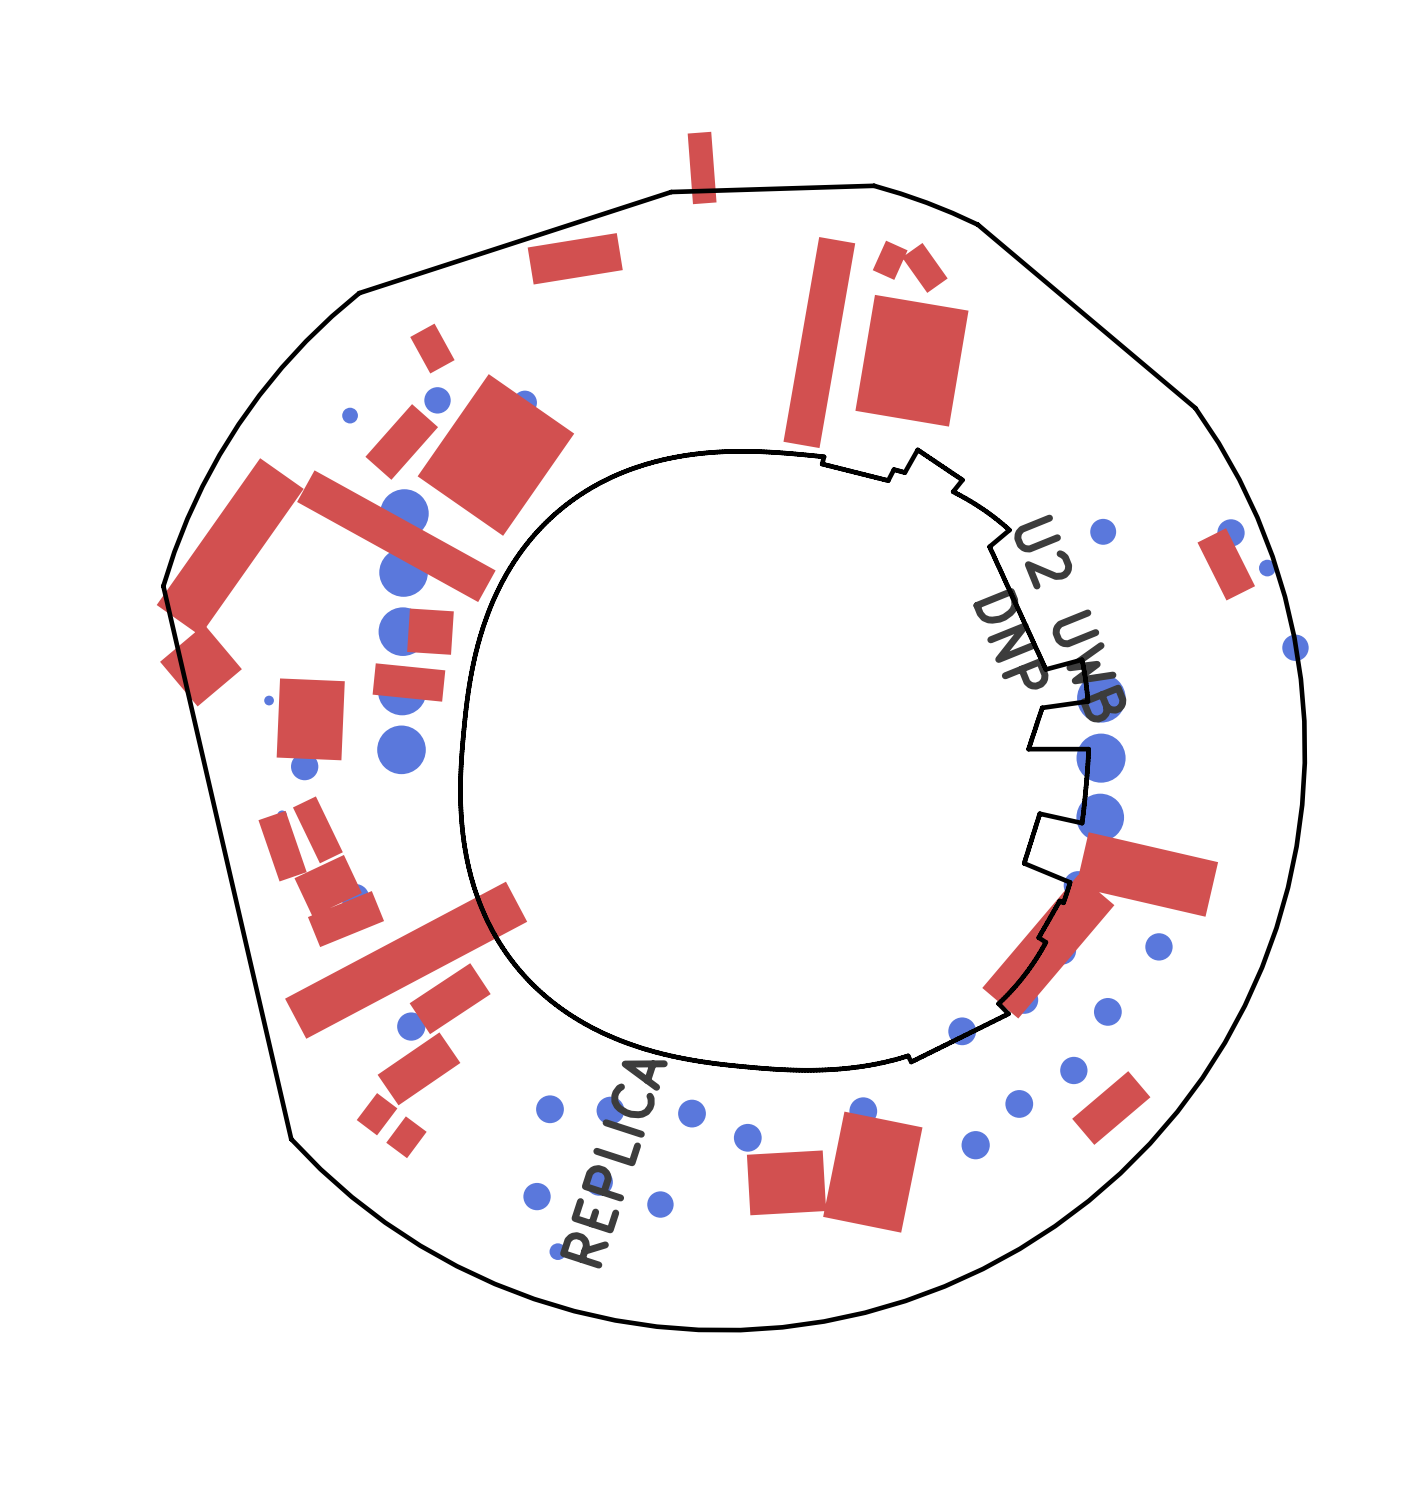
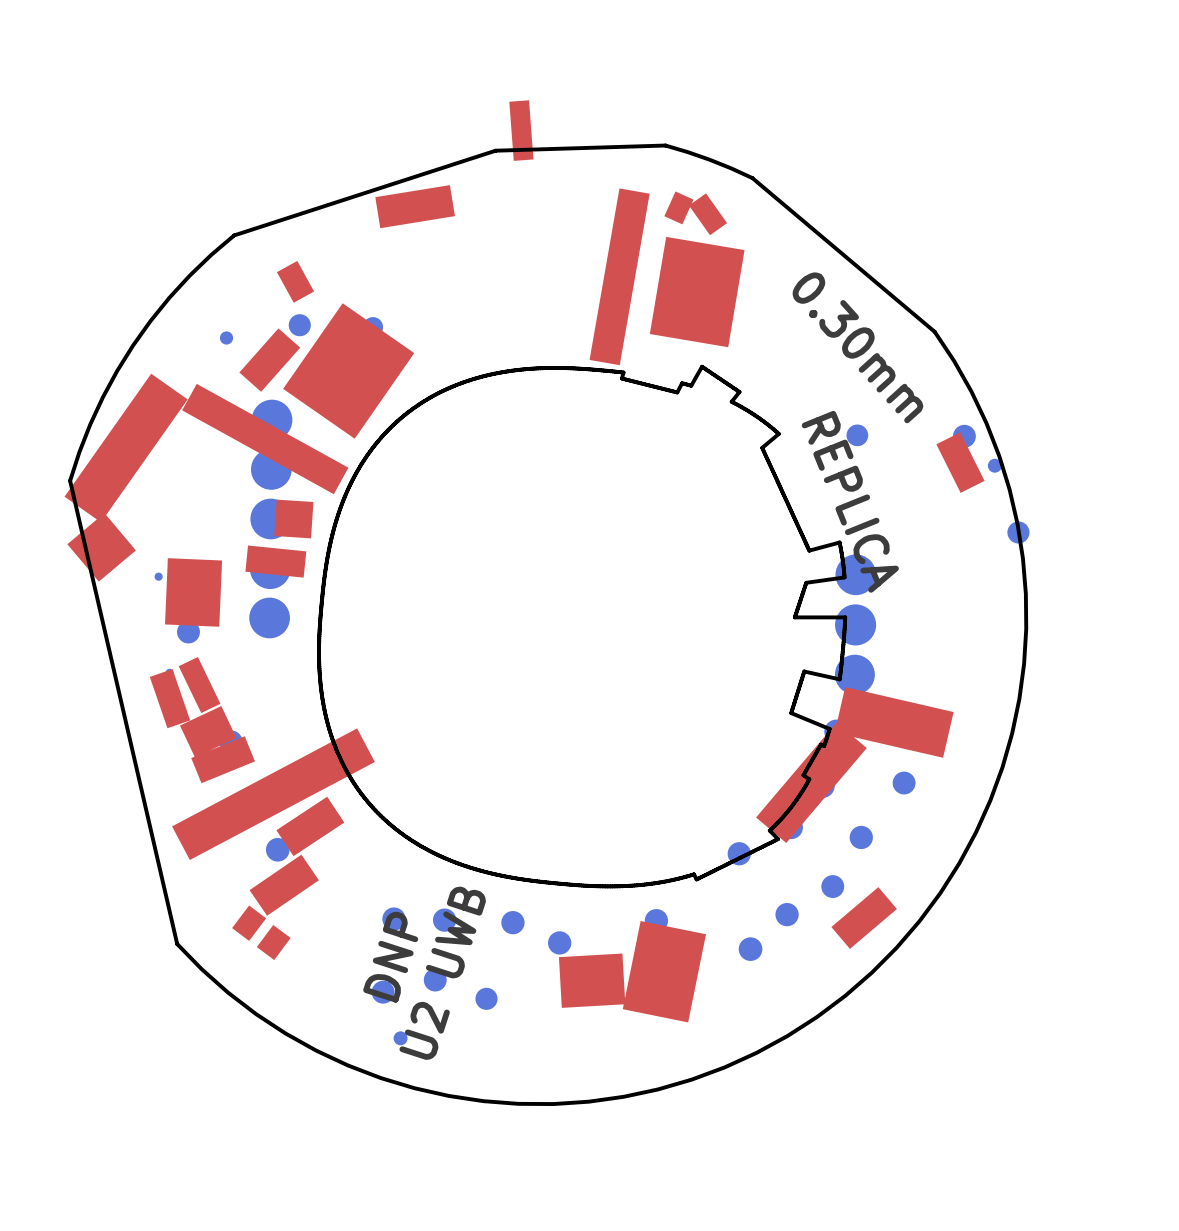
drawing: none -> [792, 272, 924, 424]
drawing: [973, 514, 1127, 723] -> none
drawing: none -> [363, 886, 486, 1060]
drawing position: (613, 1164) -> (850, 501)

